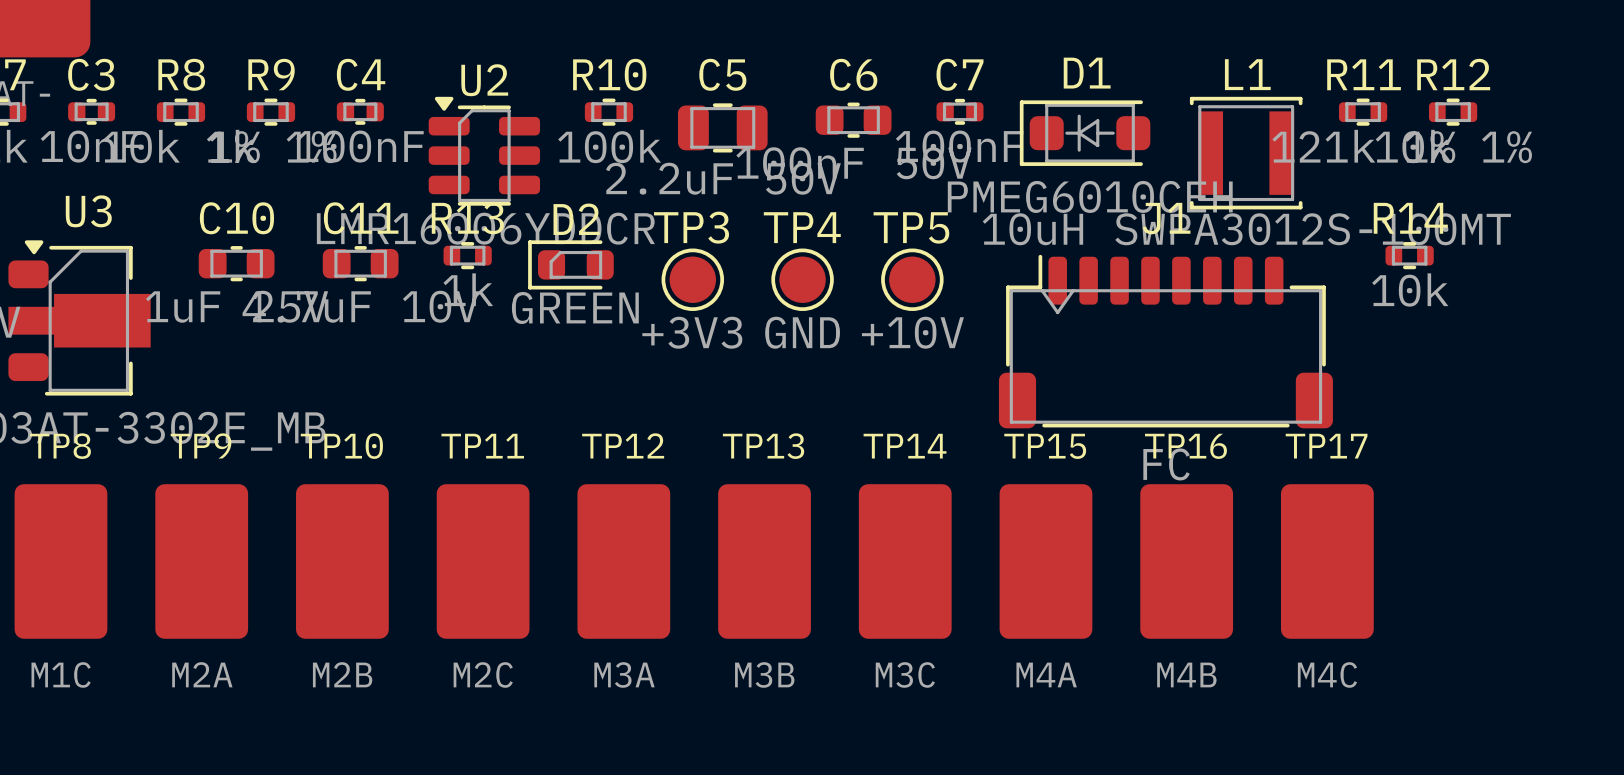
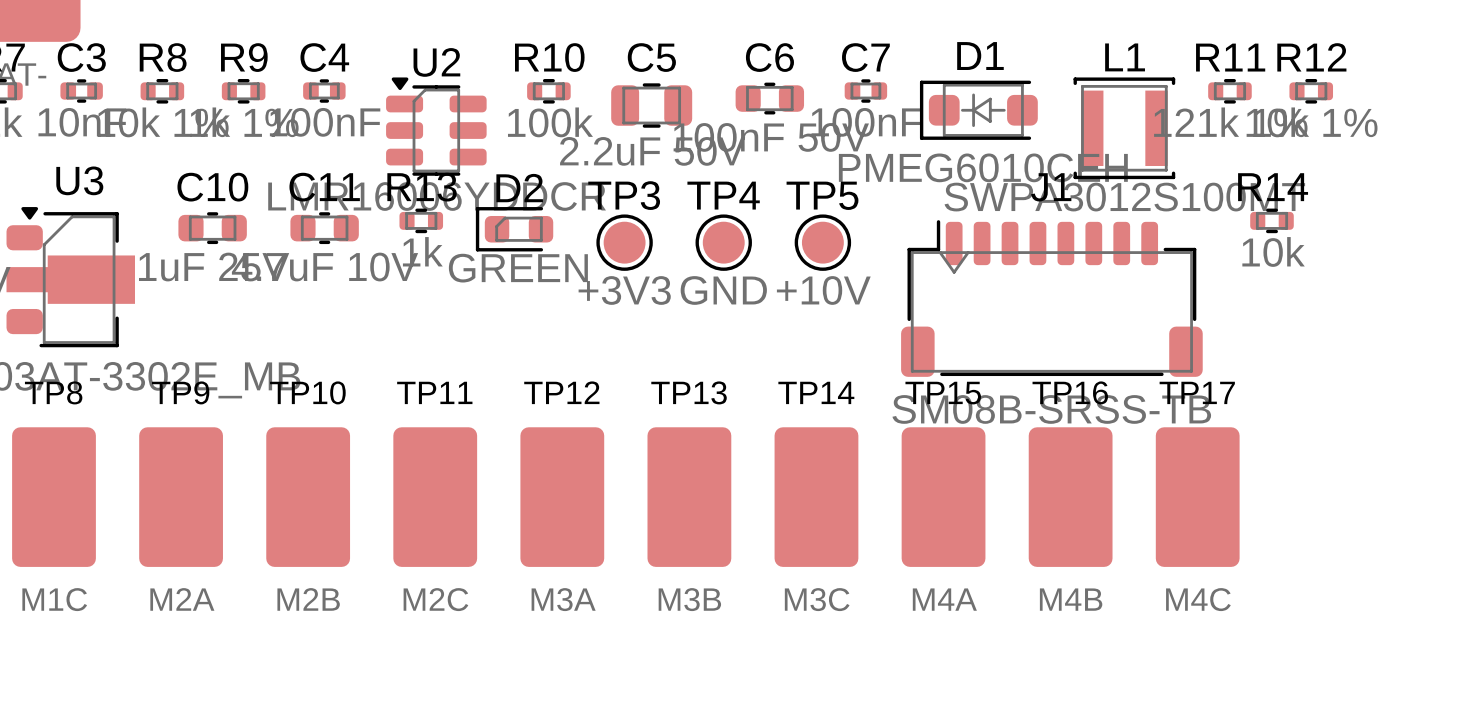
L1 value: 10uH SWPA3012S-100MT (1246, 229) -> SWPA3012S100MT (1124, 197)
J1 value: FC (1166, 464) -> SM08B-SRSS-TB (1051, 409)

